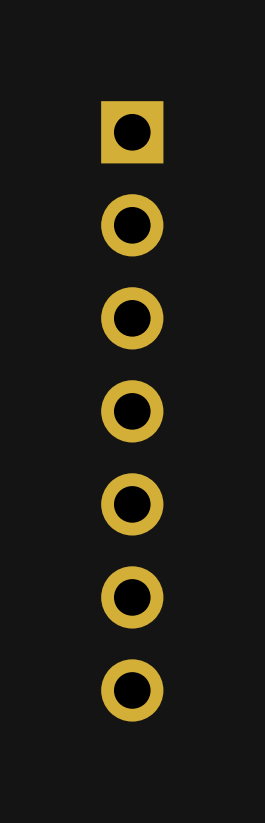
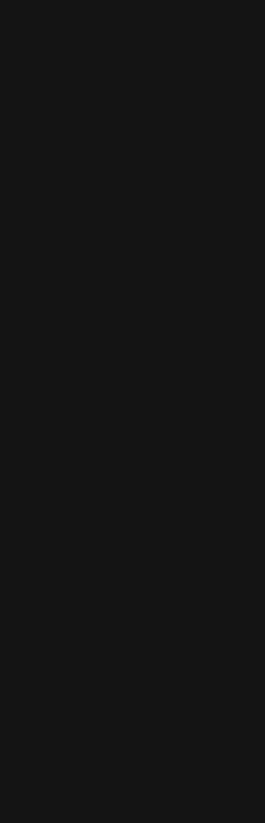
part: (132, 411) -> none

